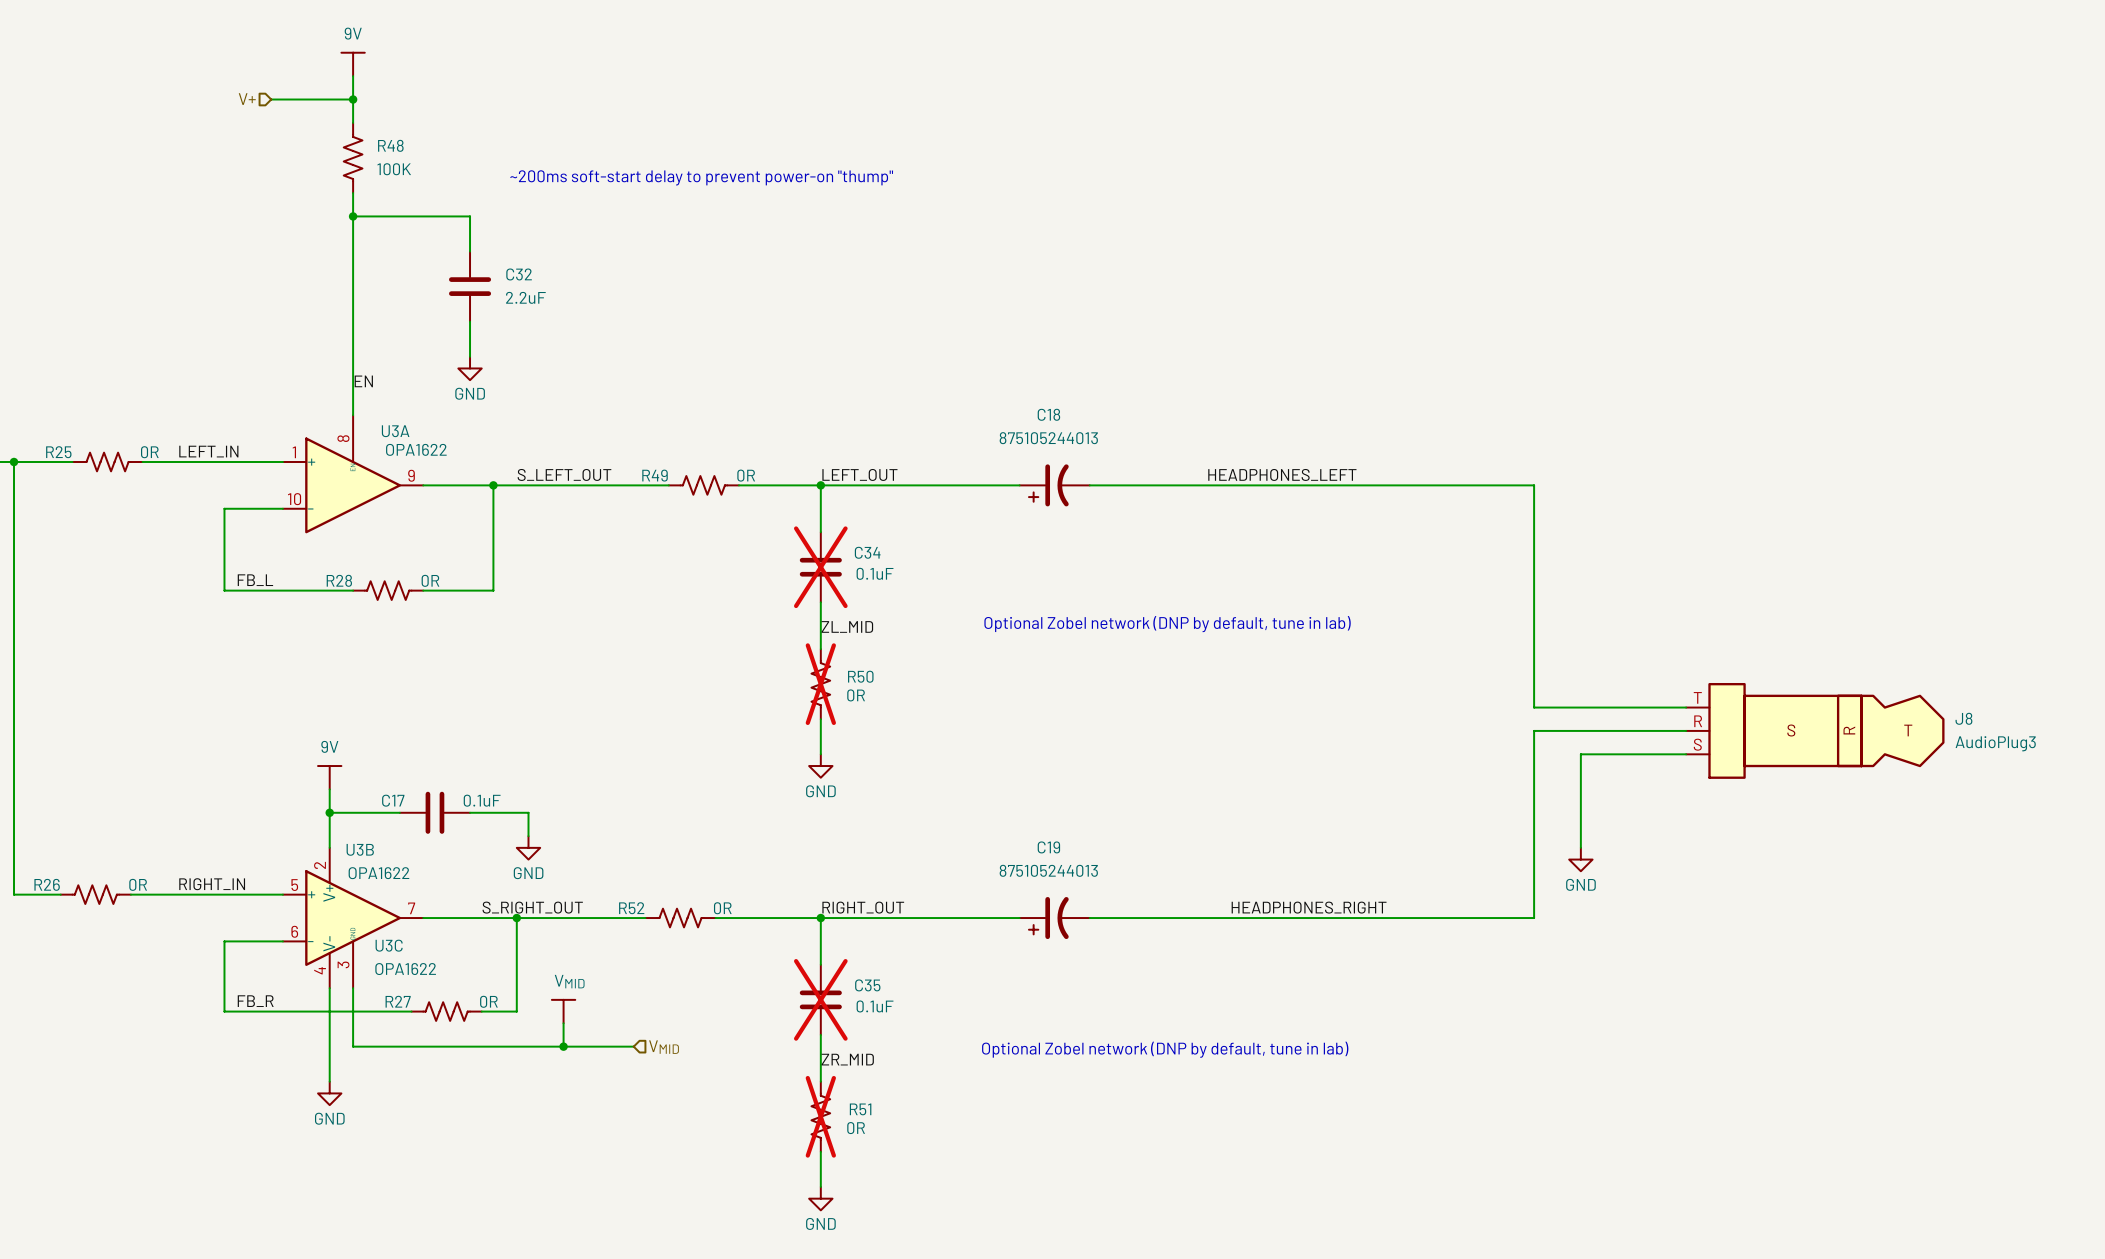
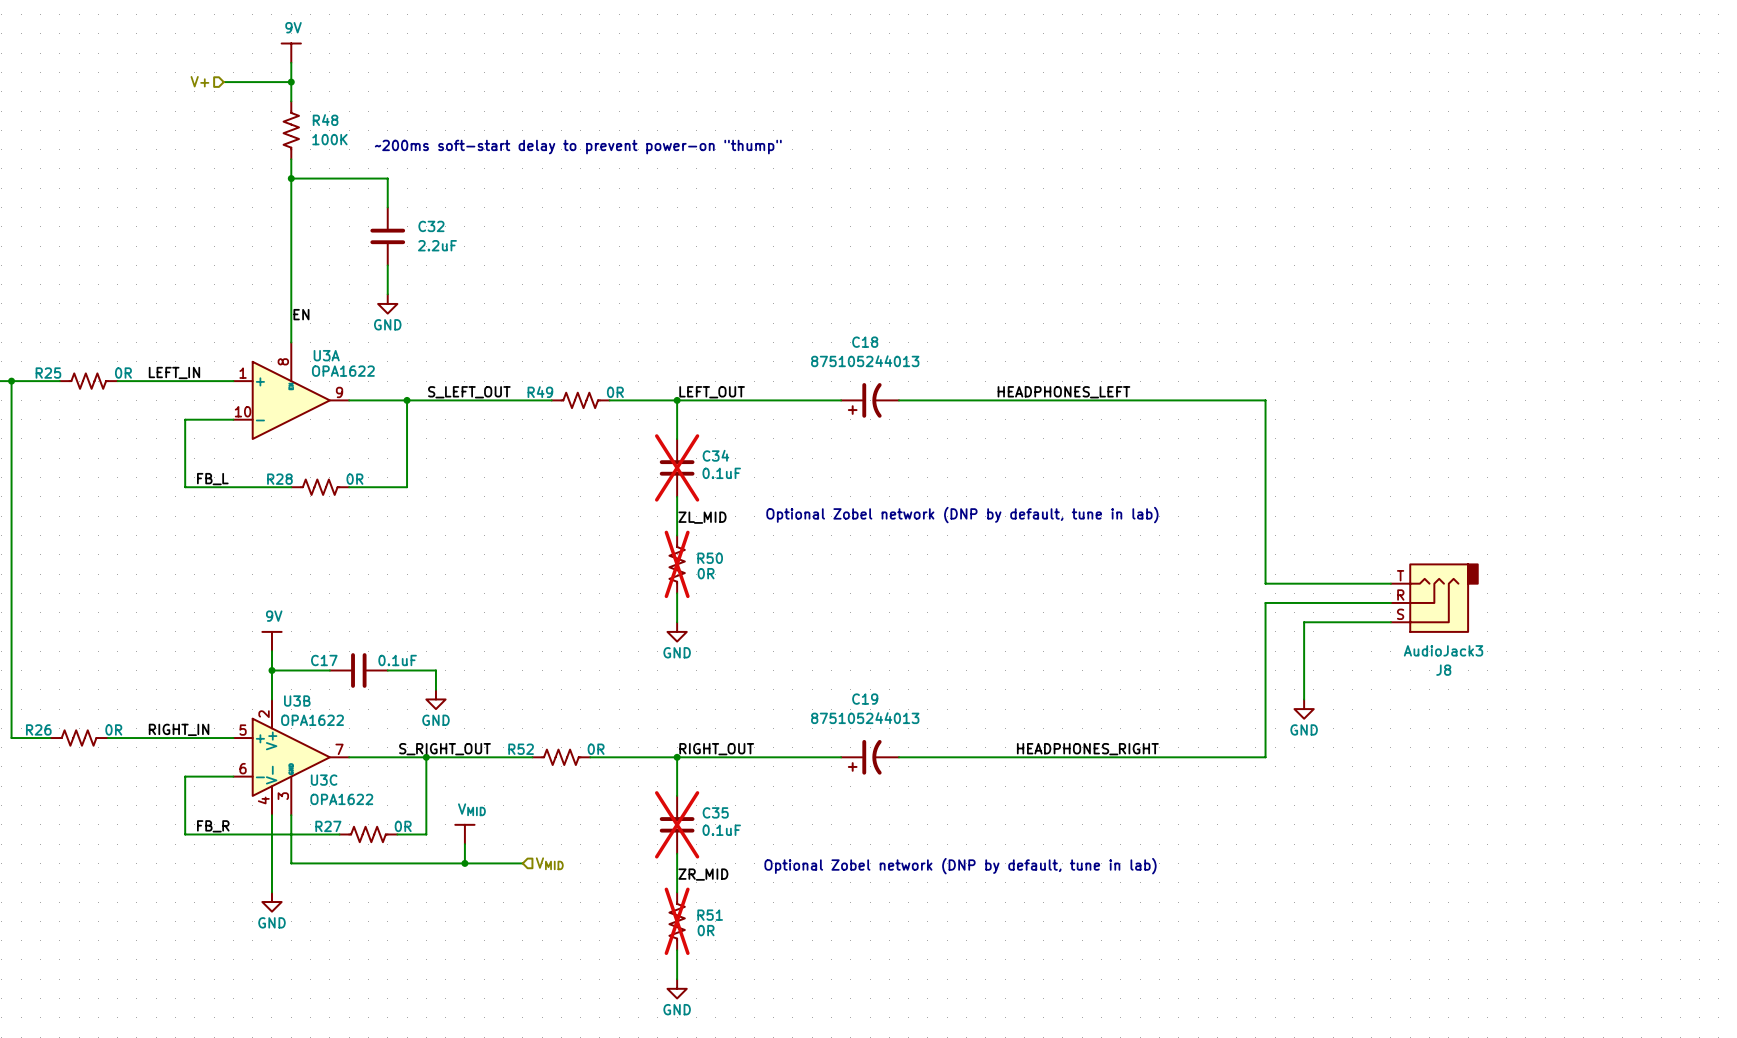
J8 symbol: [1686, 682, 1945, 779] -> [1390, 563, 1479, 633]
J8 name position: J8 (1963, 718) -> J8 (1443, 670)
J8 value: AudioPlug3 (1995, 743) -> AudioJack3 (1443, 650)

